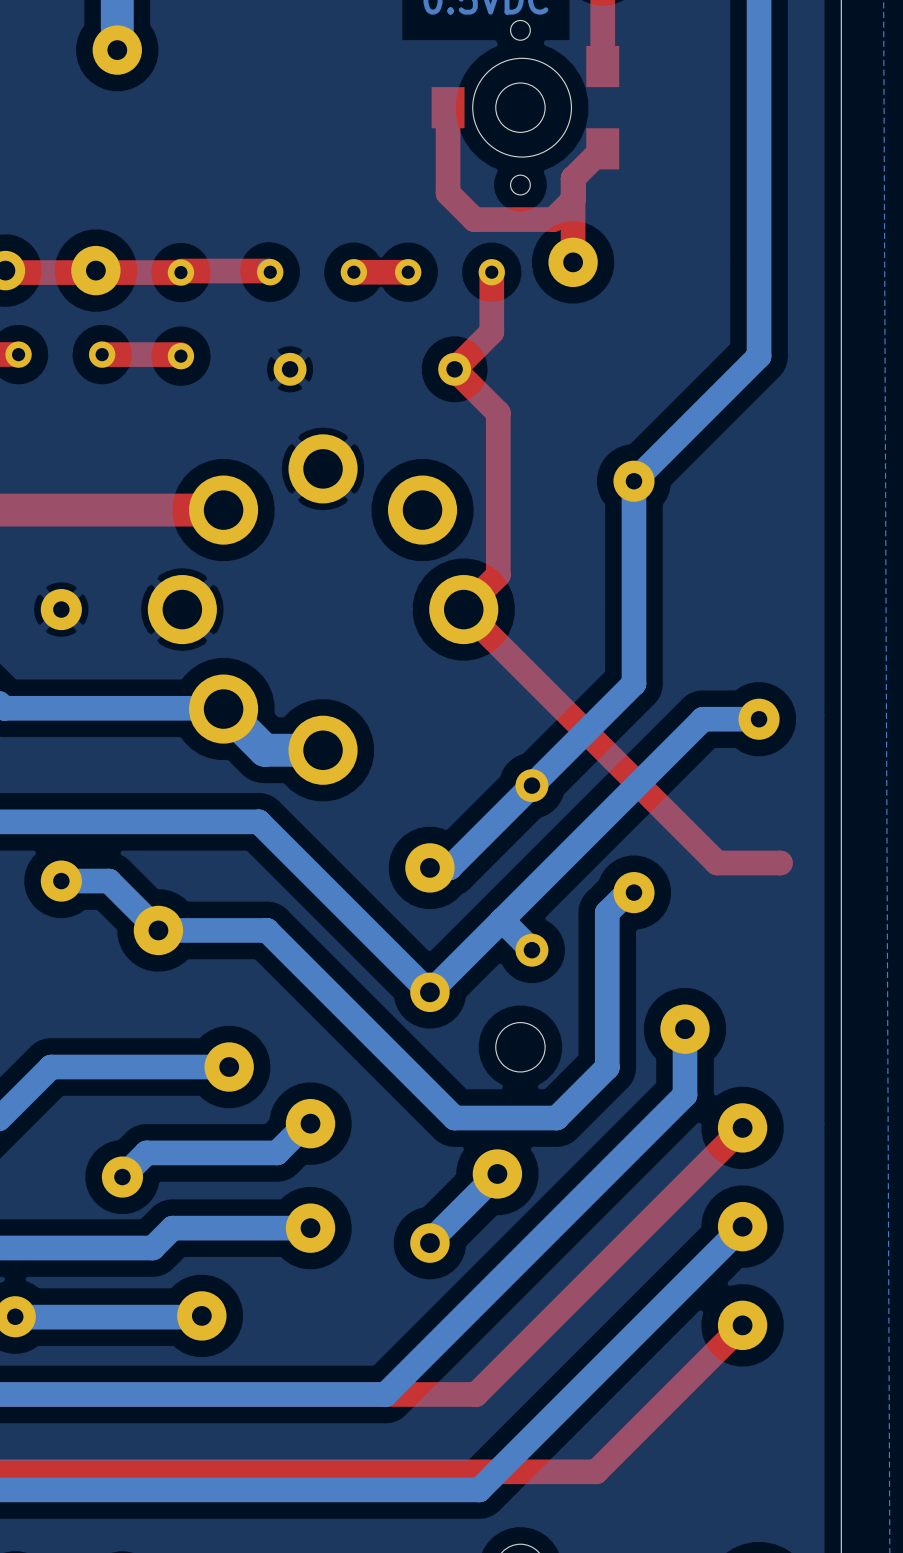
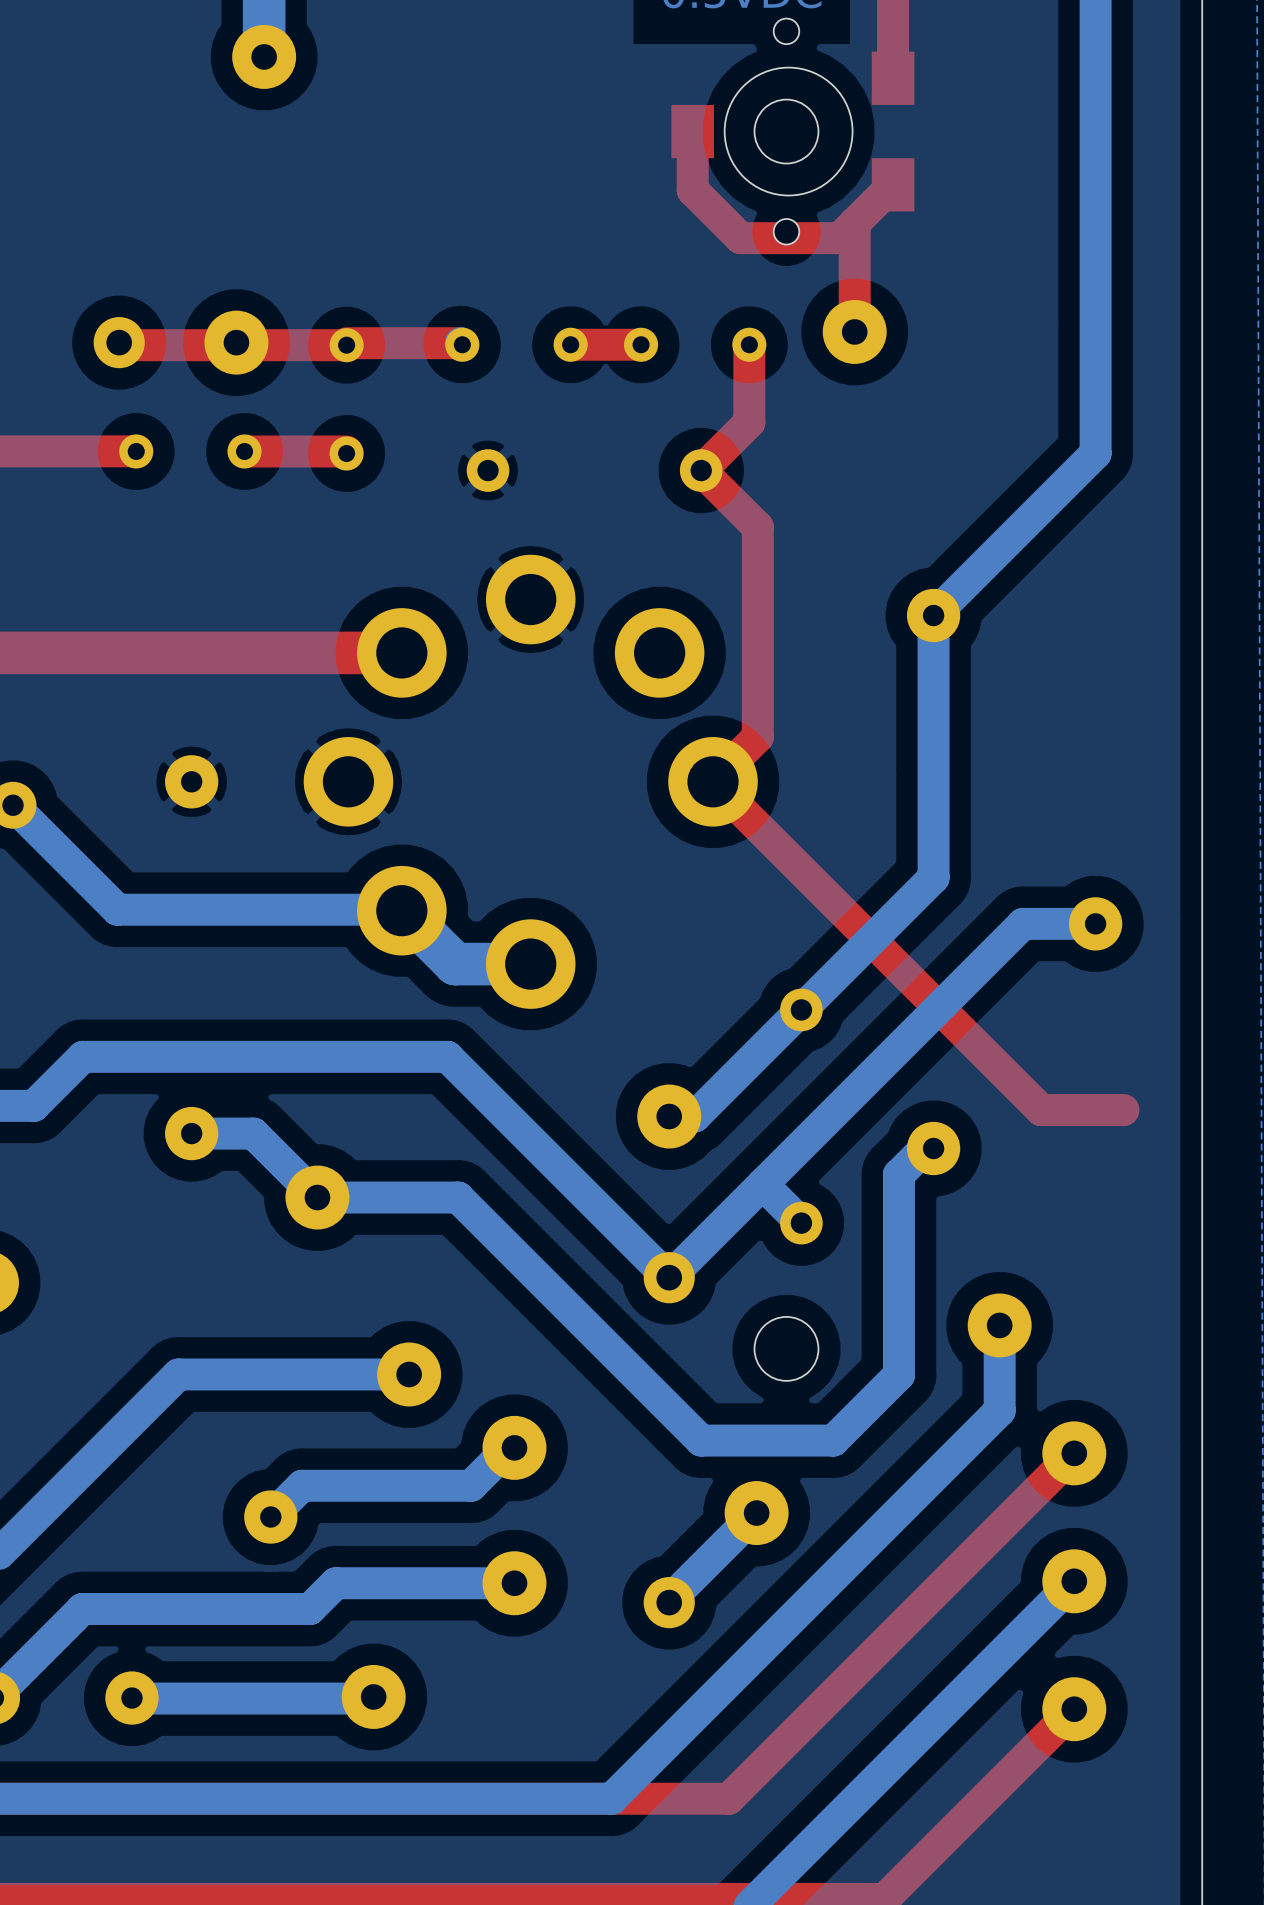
top track: (448, 152) (448, 193) (474, 219) (553, 219) (573, 199) (573, 178) -> (692, 190) (740, 238) (839, 238) (854, 223)

